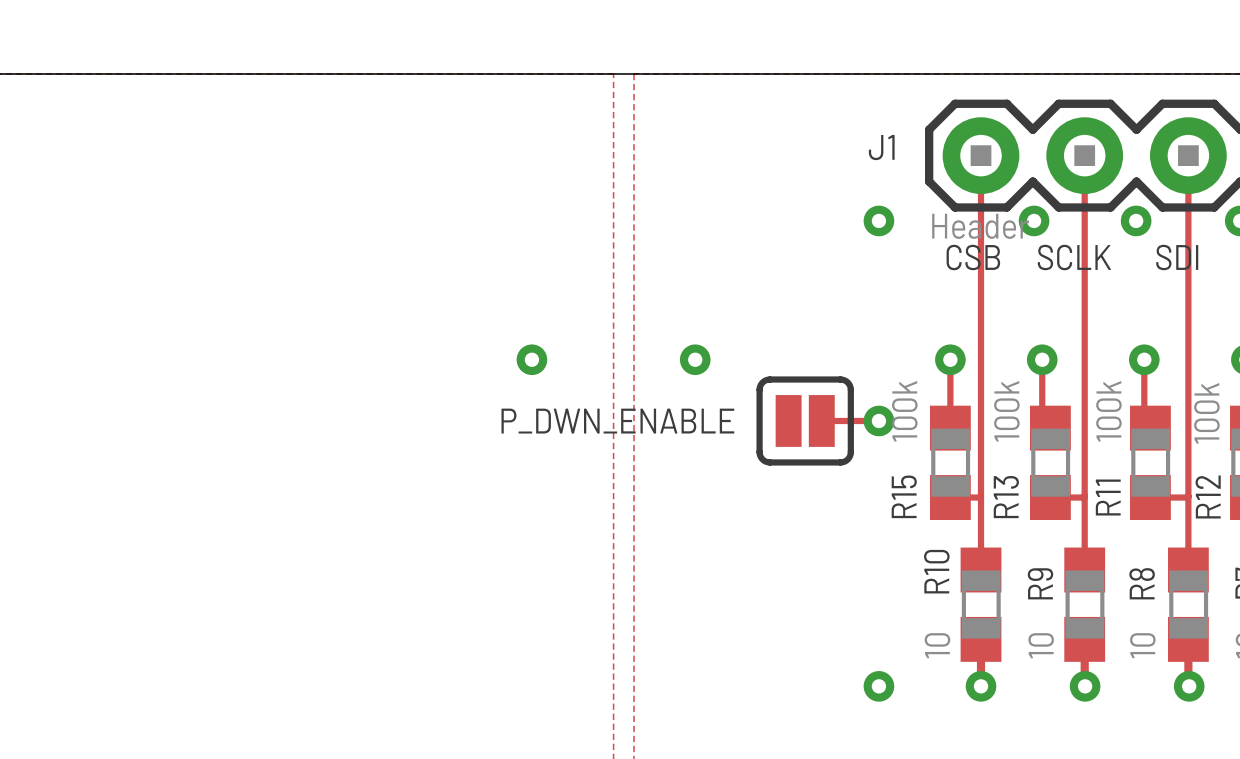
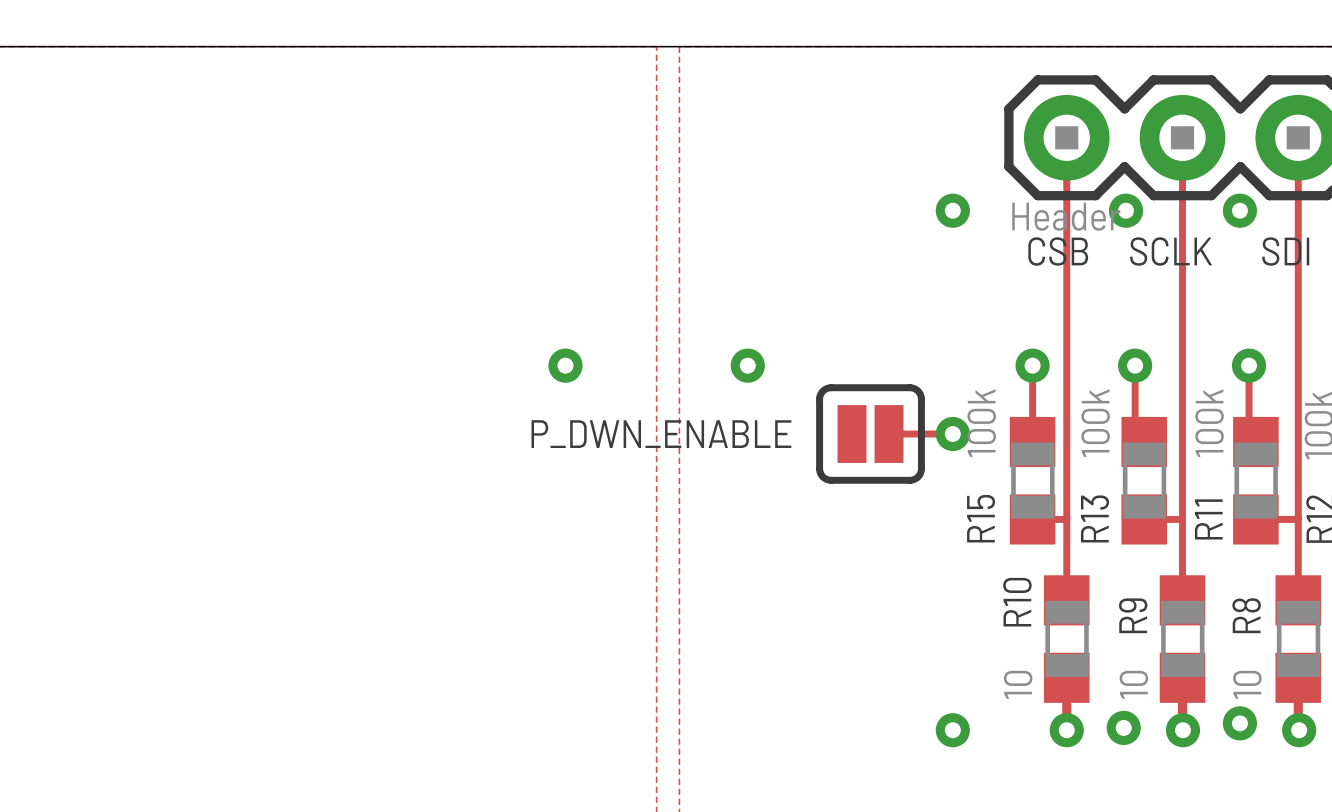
J1 name: J1 (881, 147) -> none
via: none -> (1239, 723)
via: none -> (1123, 727)

